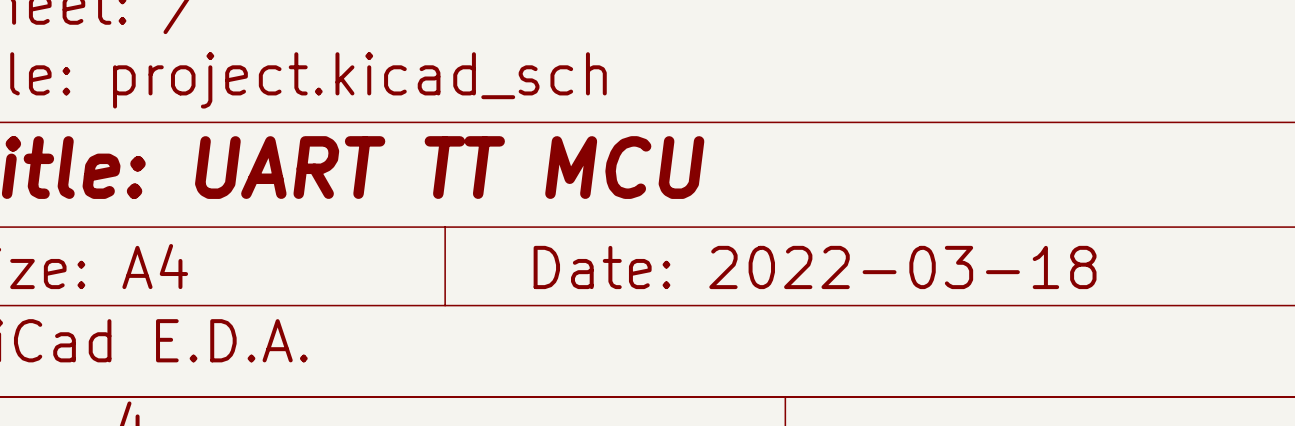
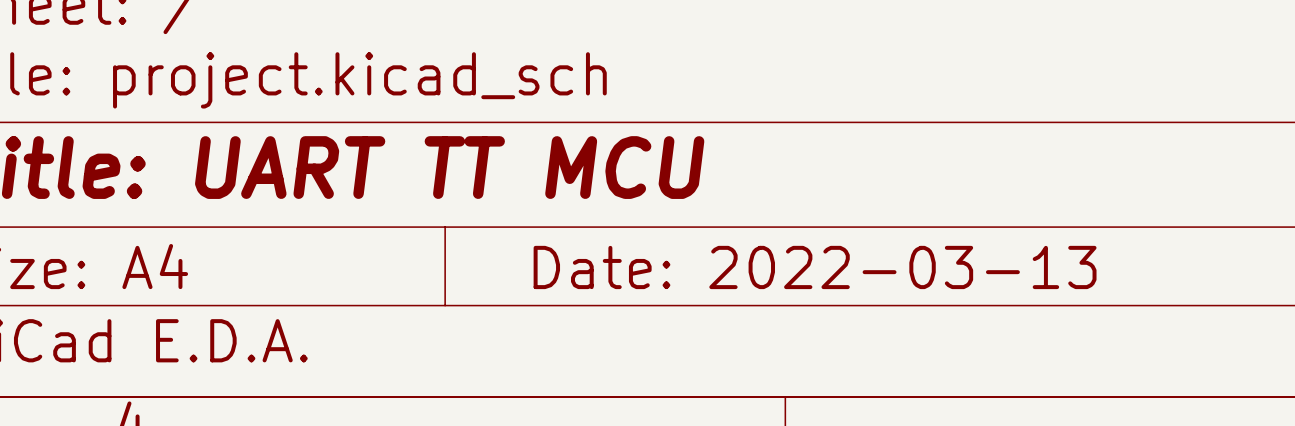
title block: Date: 2022-03-18 (815, 267) -> Date: 2022-03-13 (815, 267)

